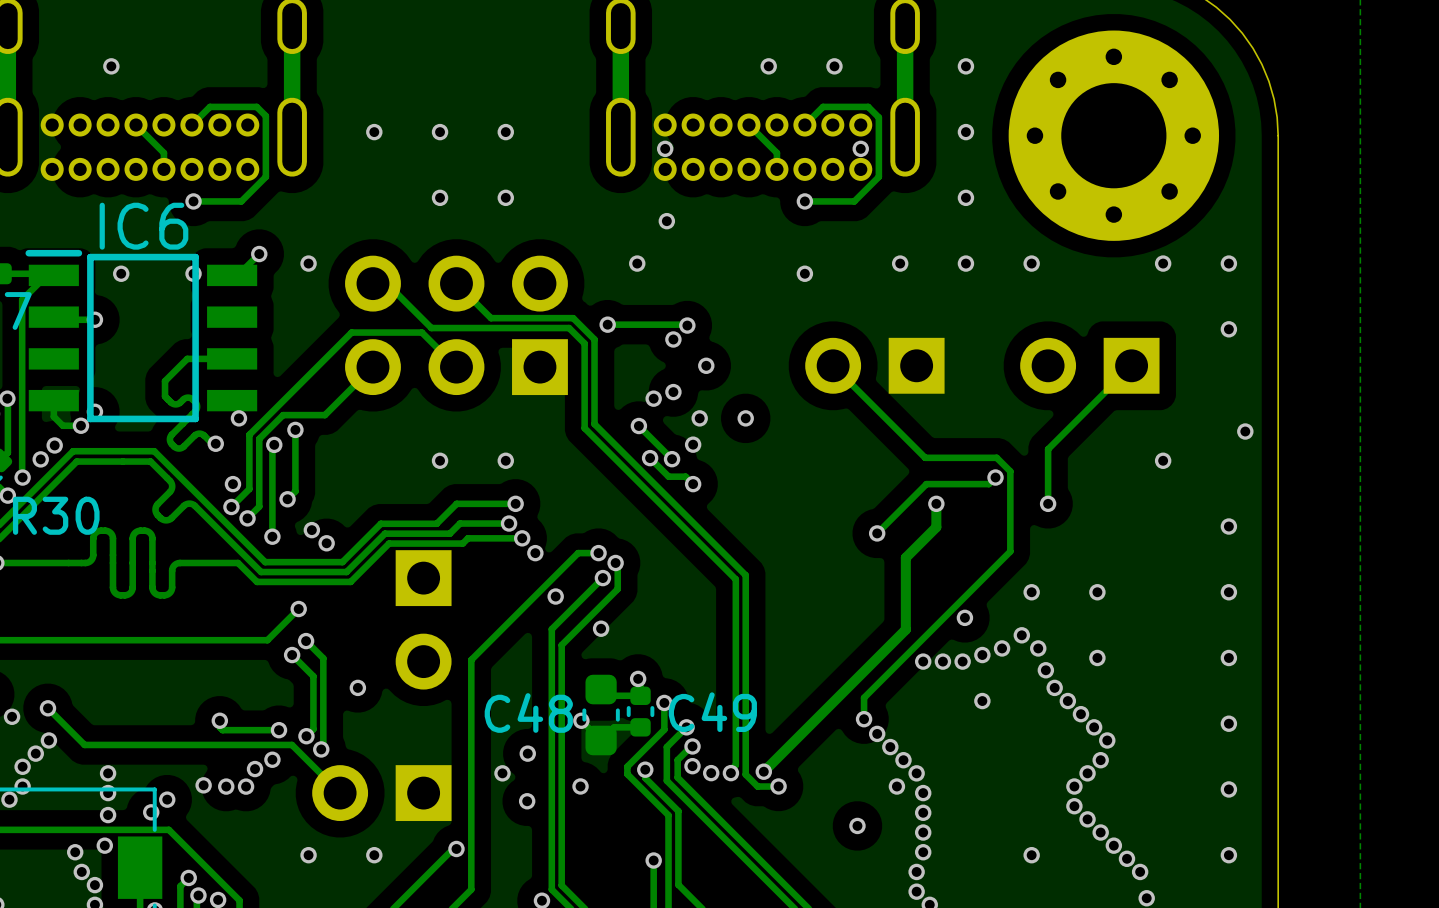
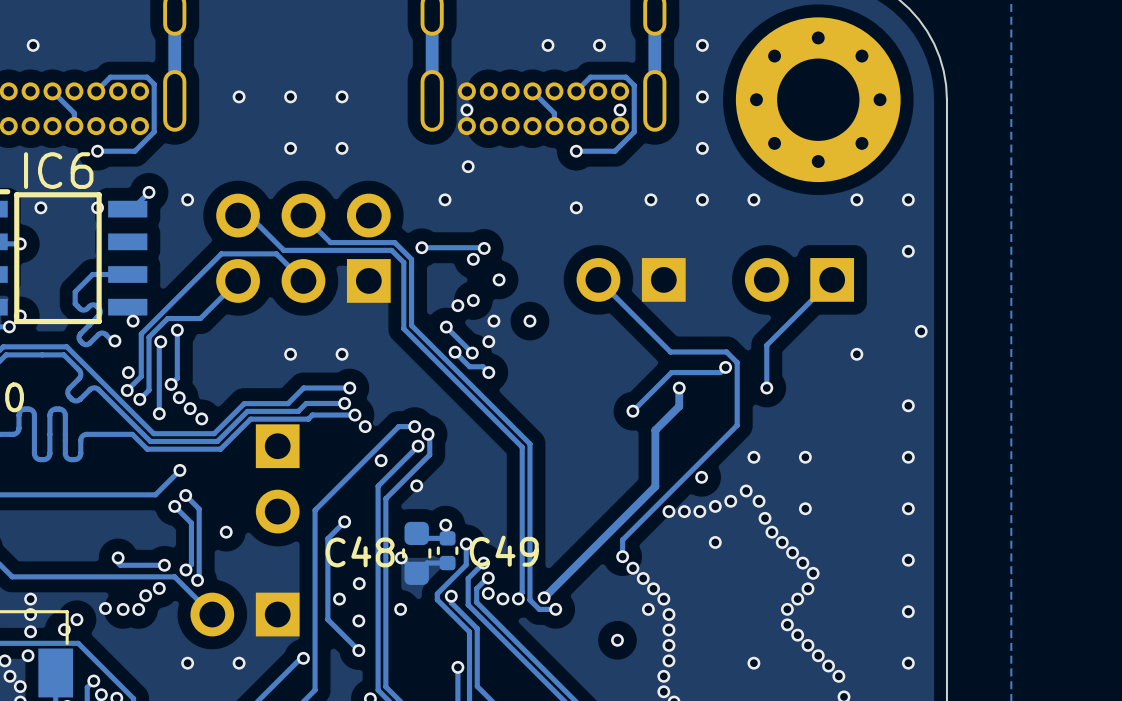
via: none -> (179, 397)
track: none -> (344, 521) (327, 538) (327, 619) (358, 650)
via: none -> (344, 521)
via: none -> (358, 650)

